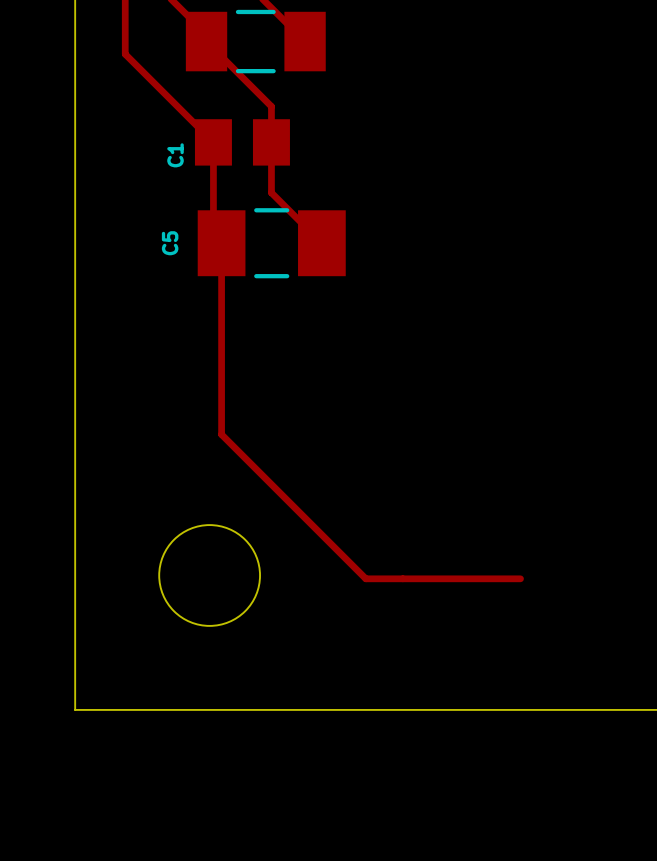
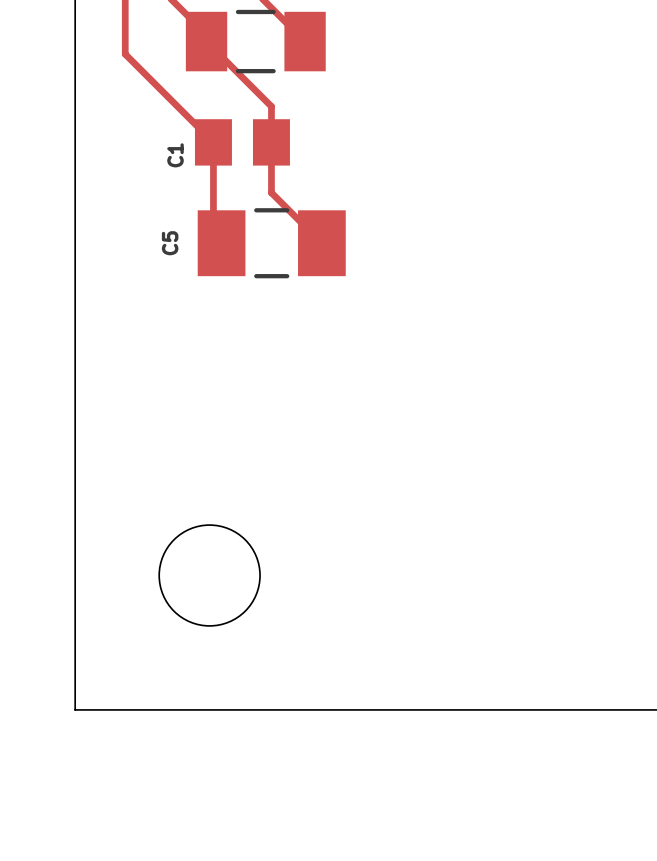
track: (221, 243) (221, 434) (365, 578) (520, 578) -> none

